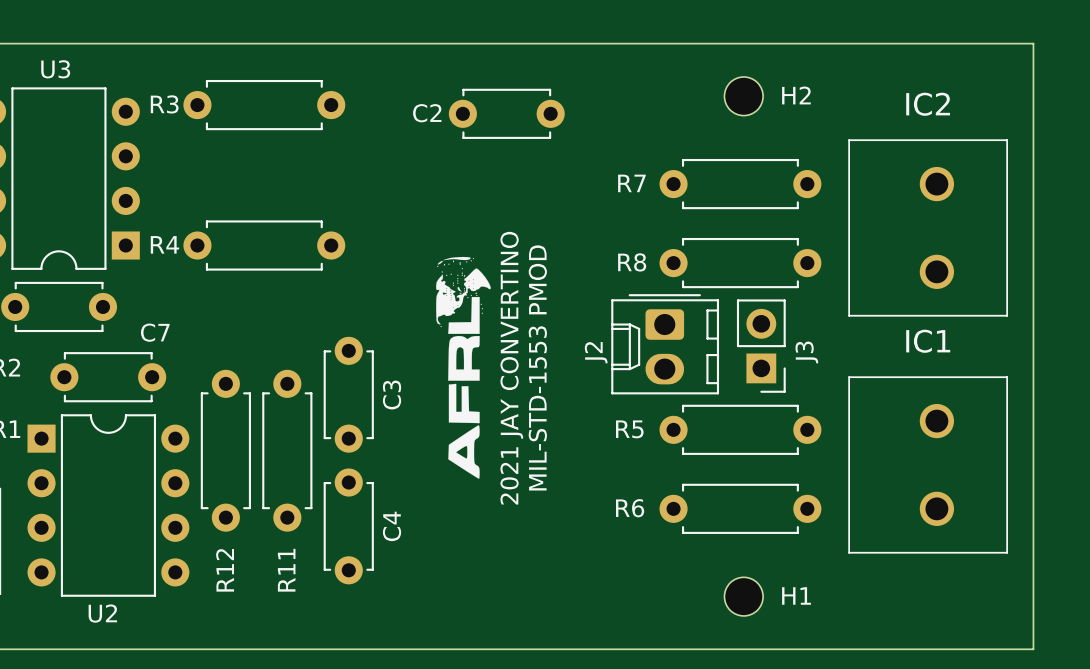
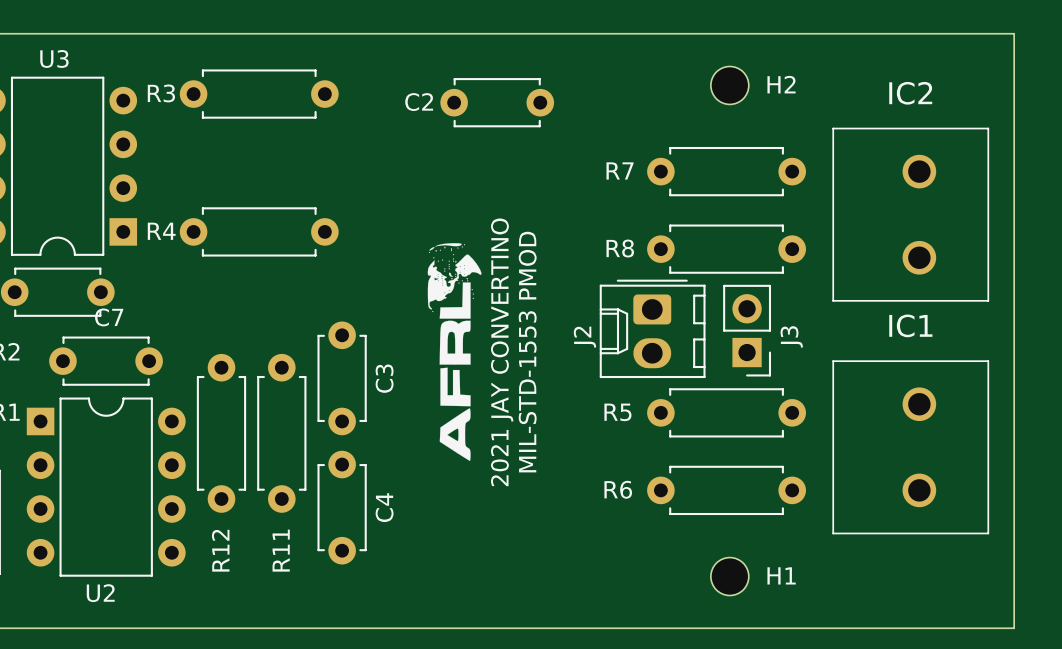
C7 name position: C7 (155, 332) -> C7 (109, 317)

